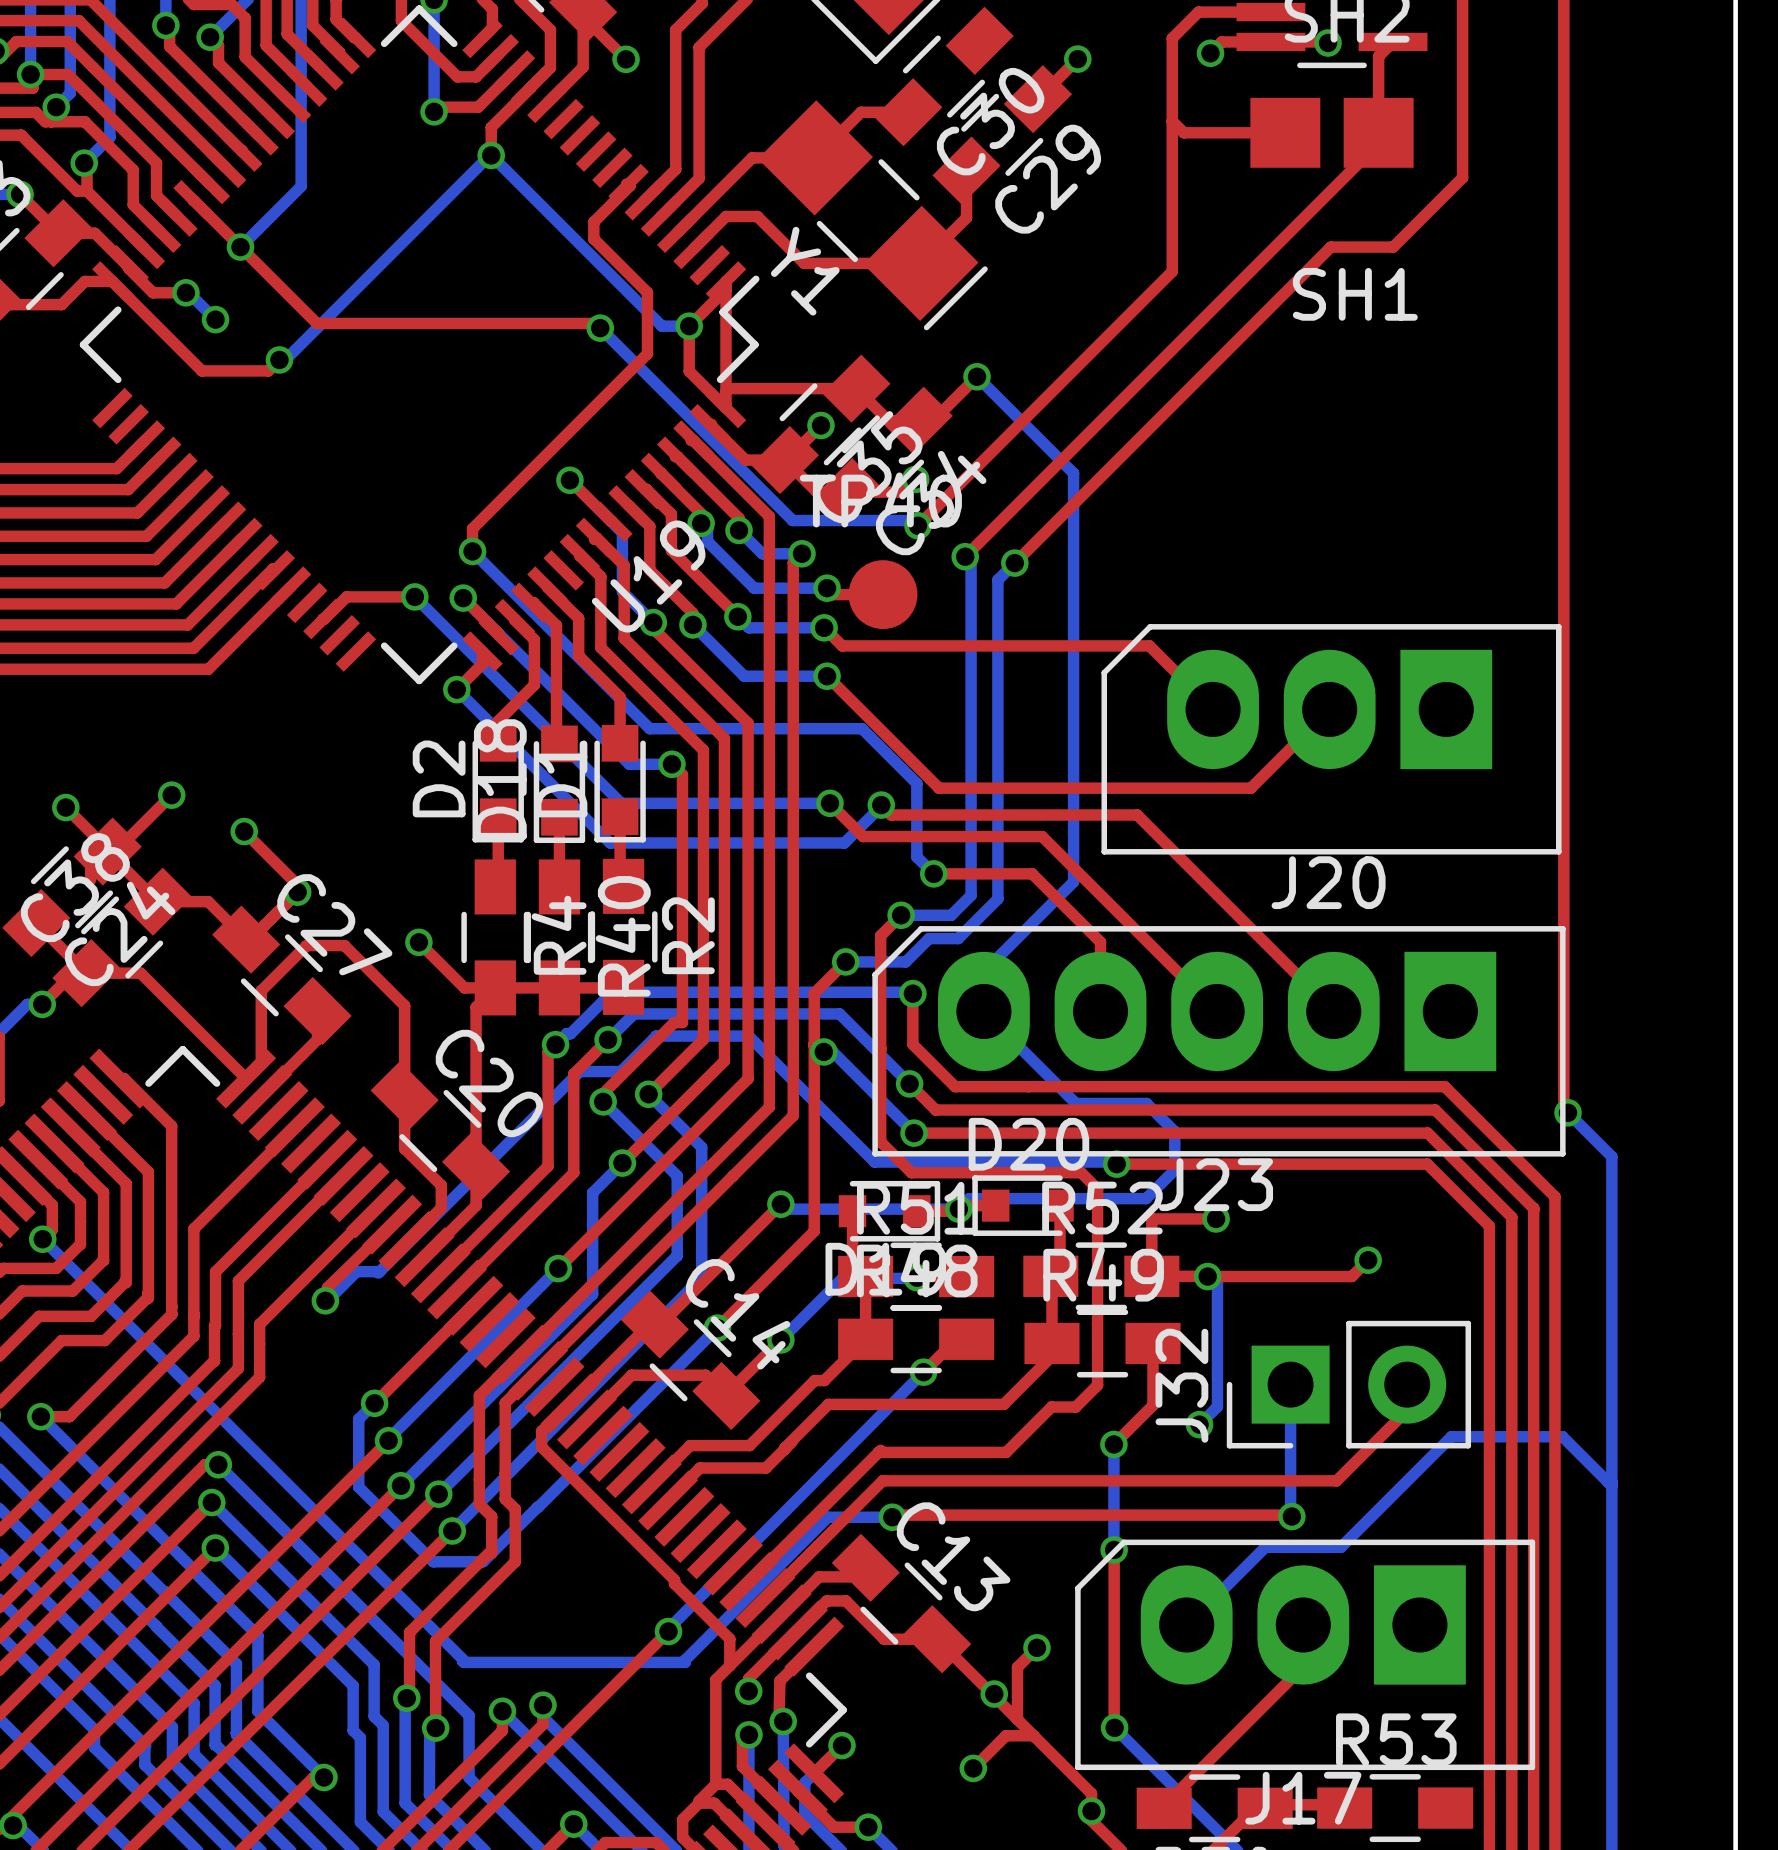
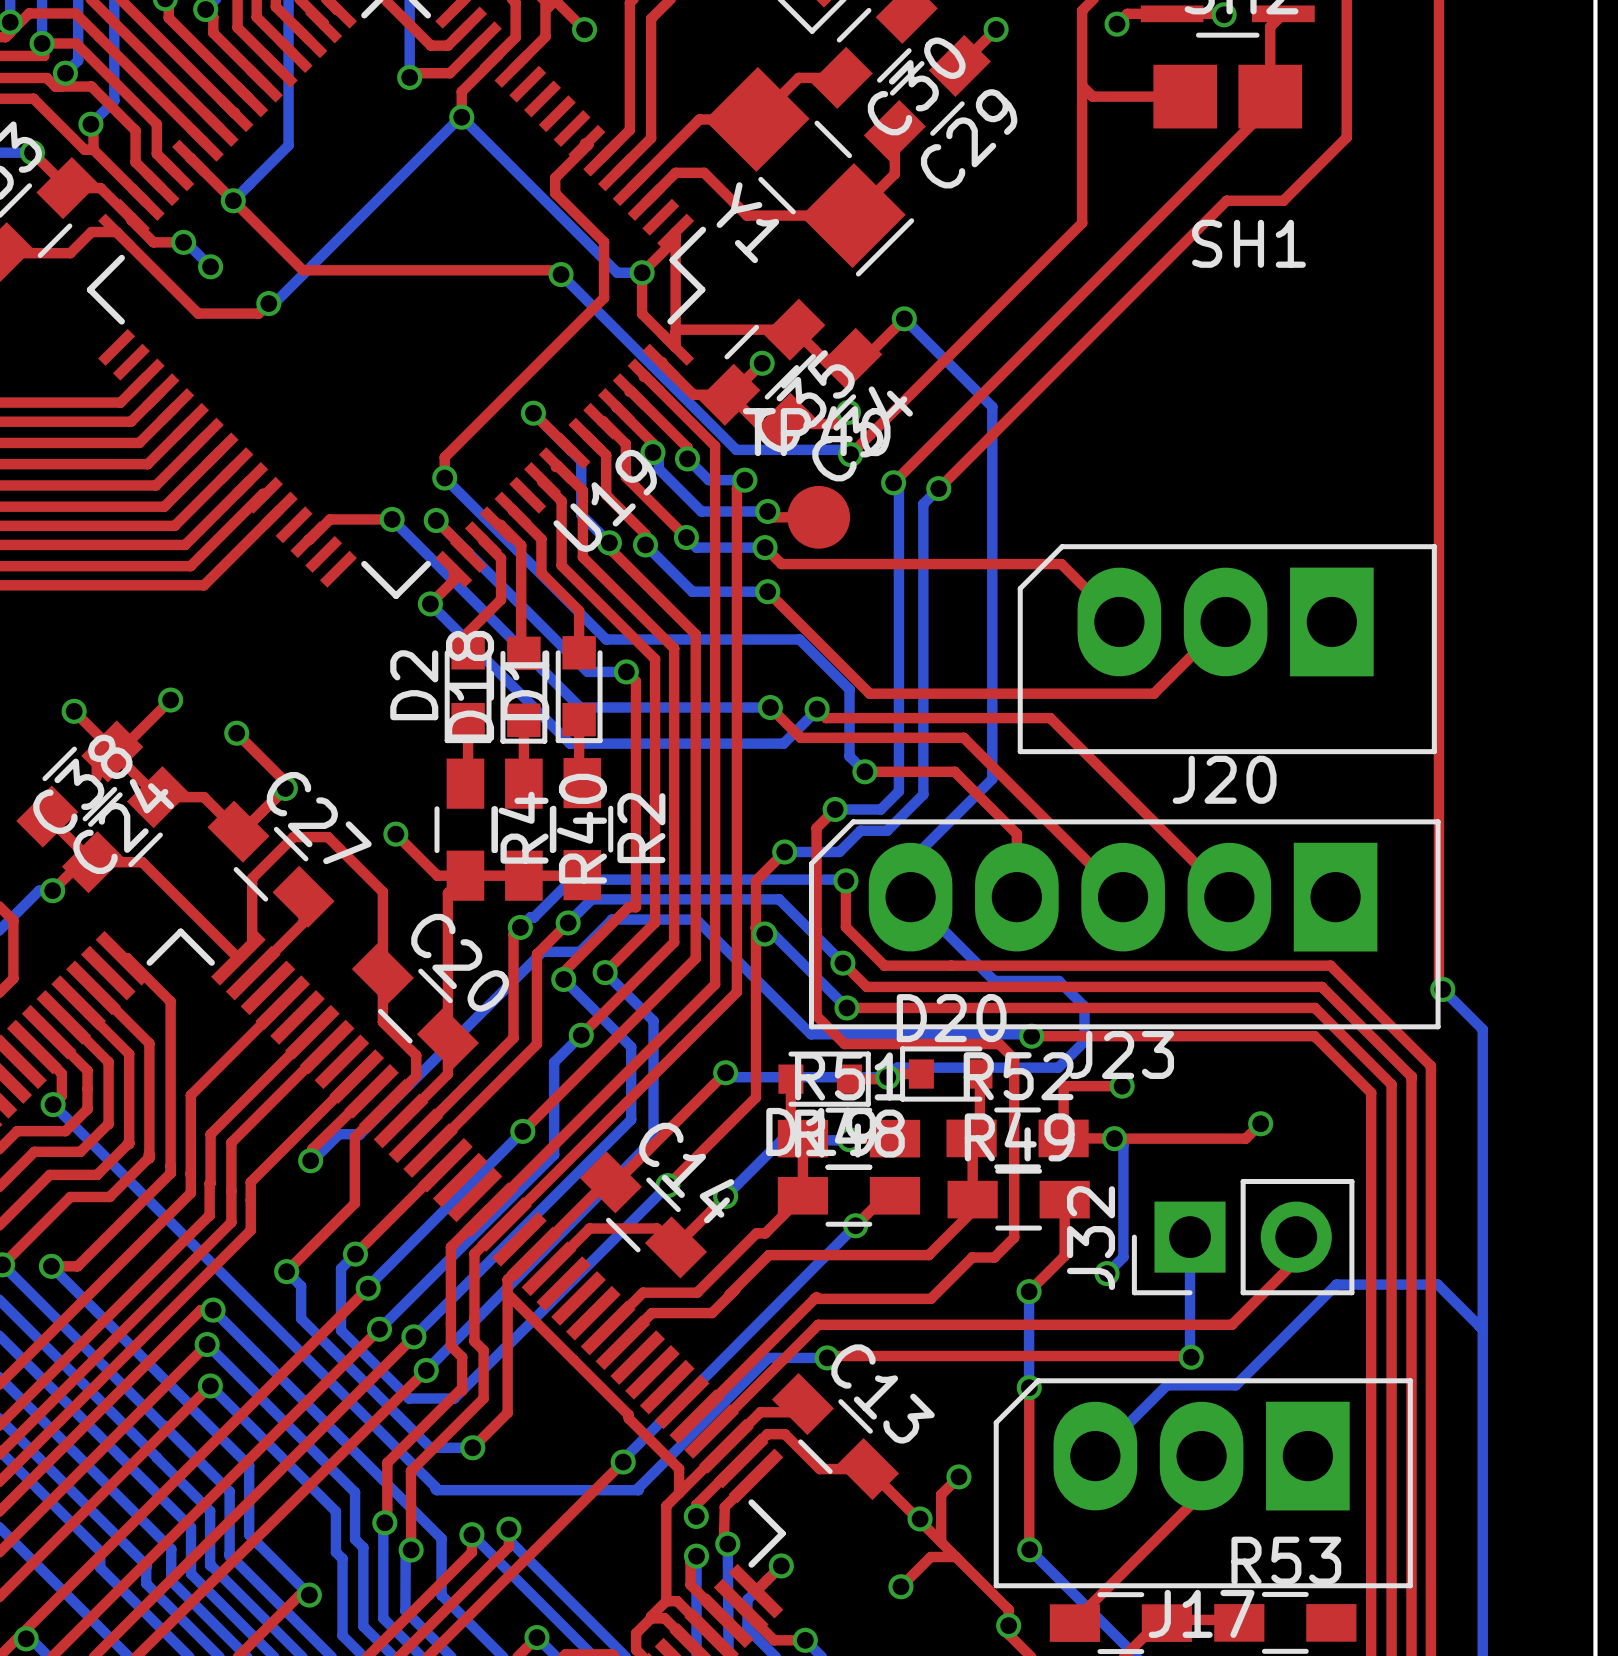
top track: none -> (386, 1106) (354, 1137) (354, 1203) (286, 1271)
bottom track: none -> (286, 1271) (301, 1286) (301, 1318) (430, 1447) (472, 1447)
via: none -> (286, 1271)
top track: none -> (507, 1293) (507, 1412) (472, 1447)
via: none -> (472, 1447)

